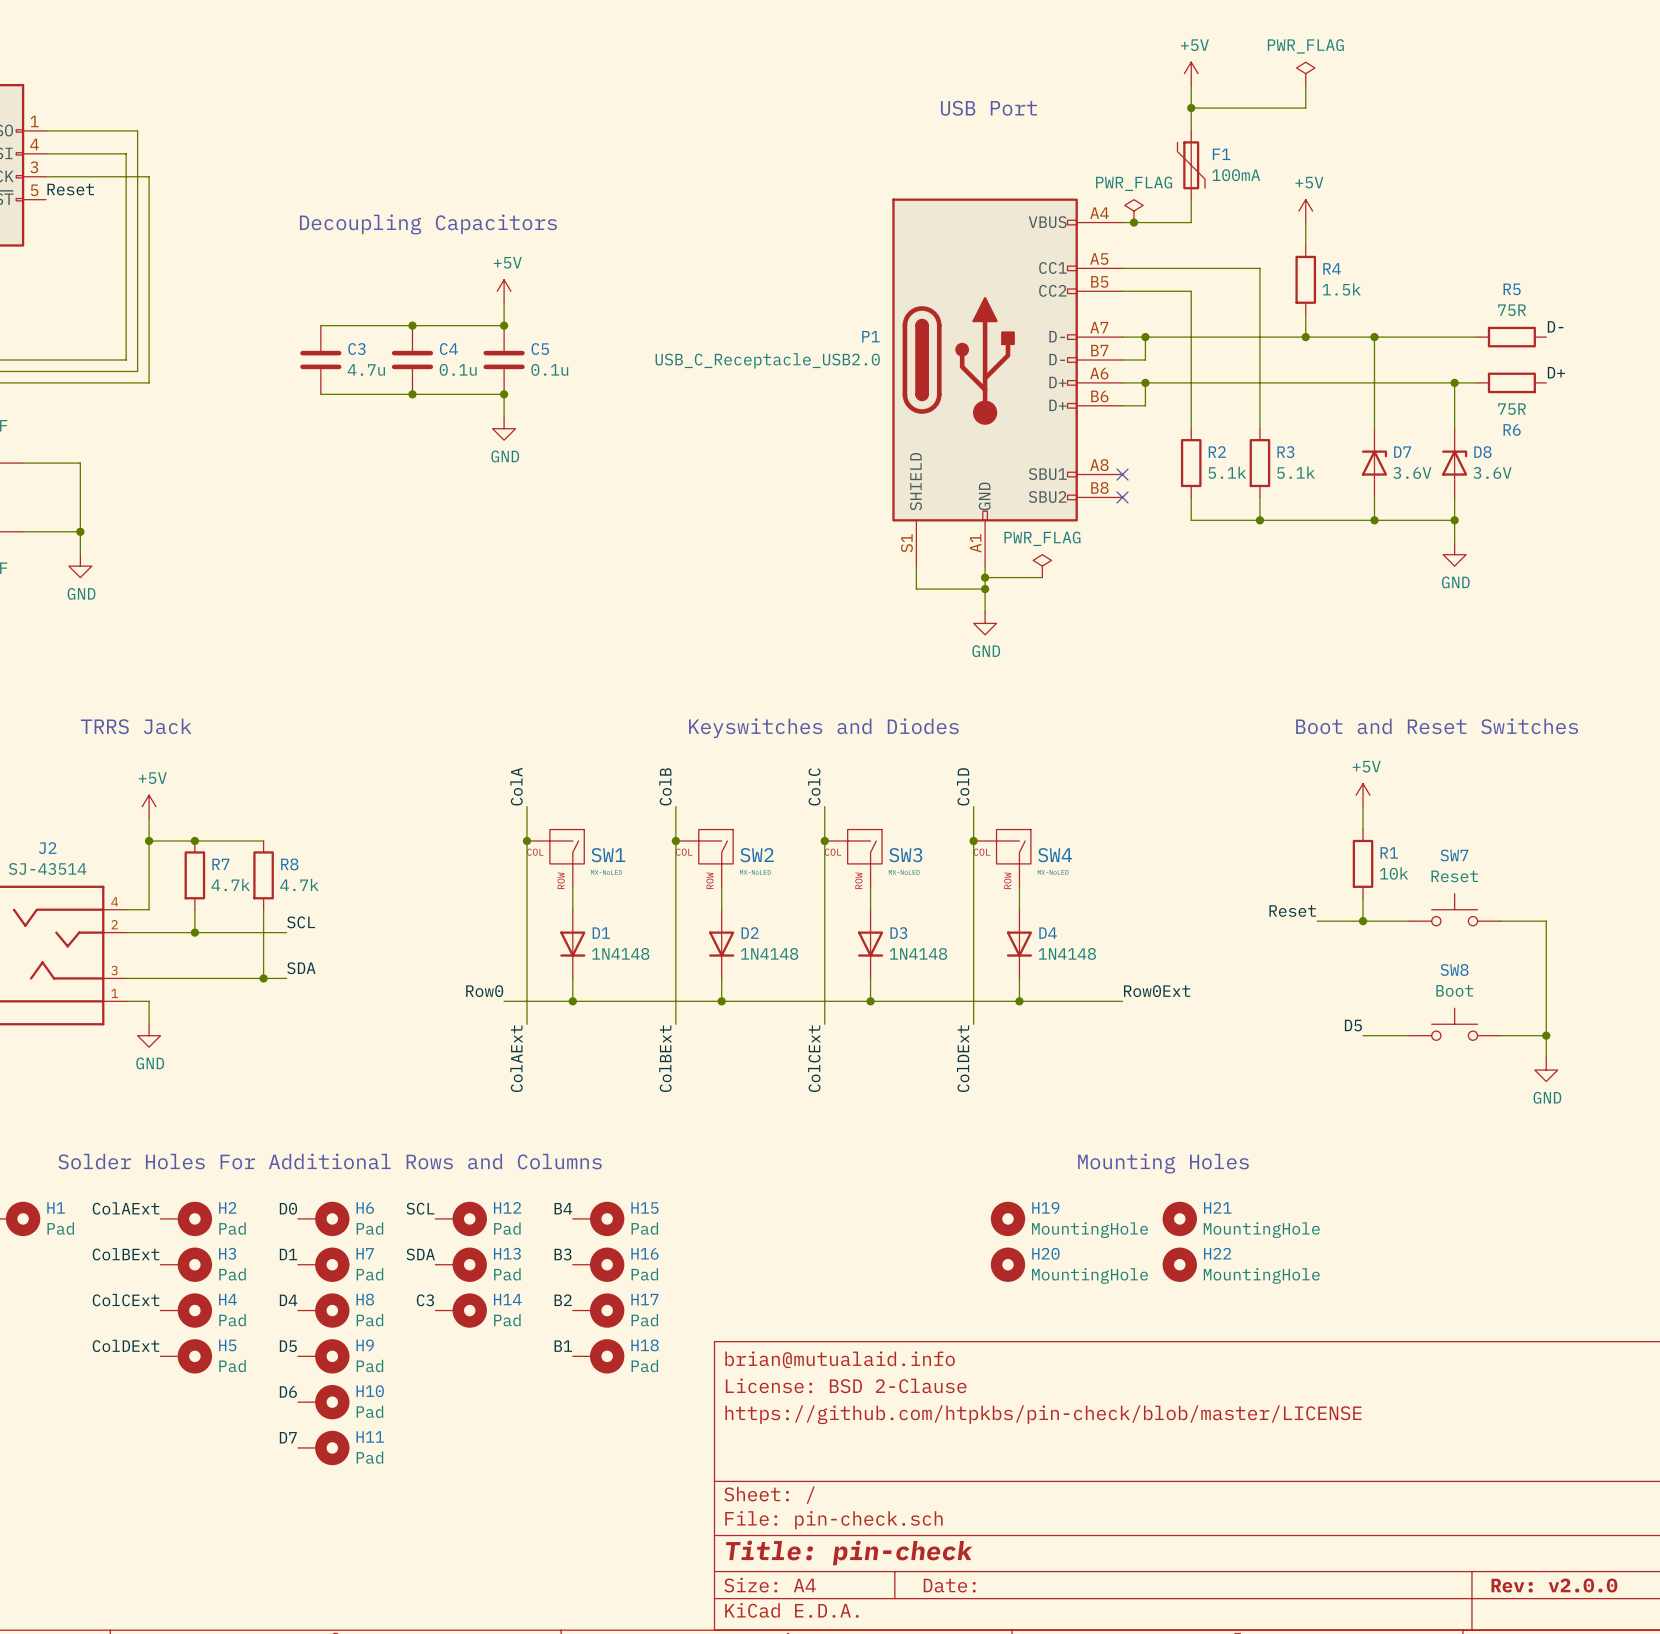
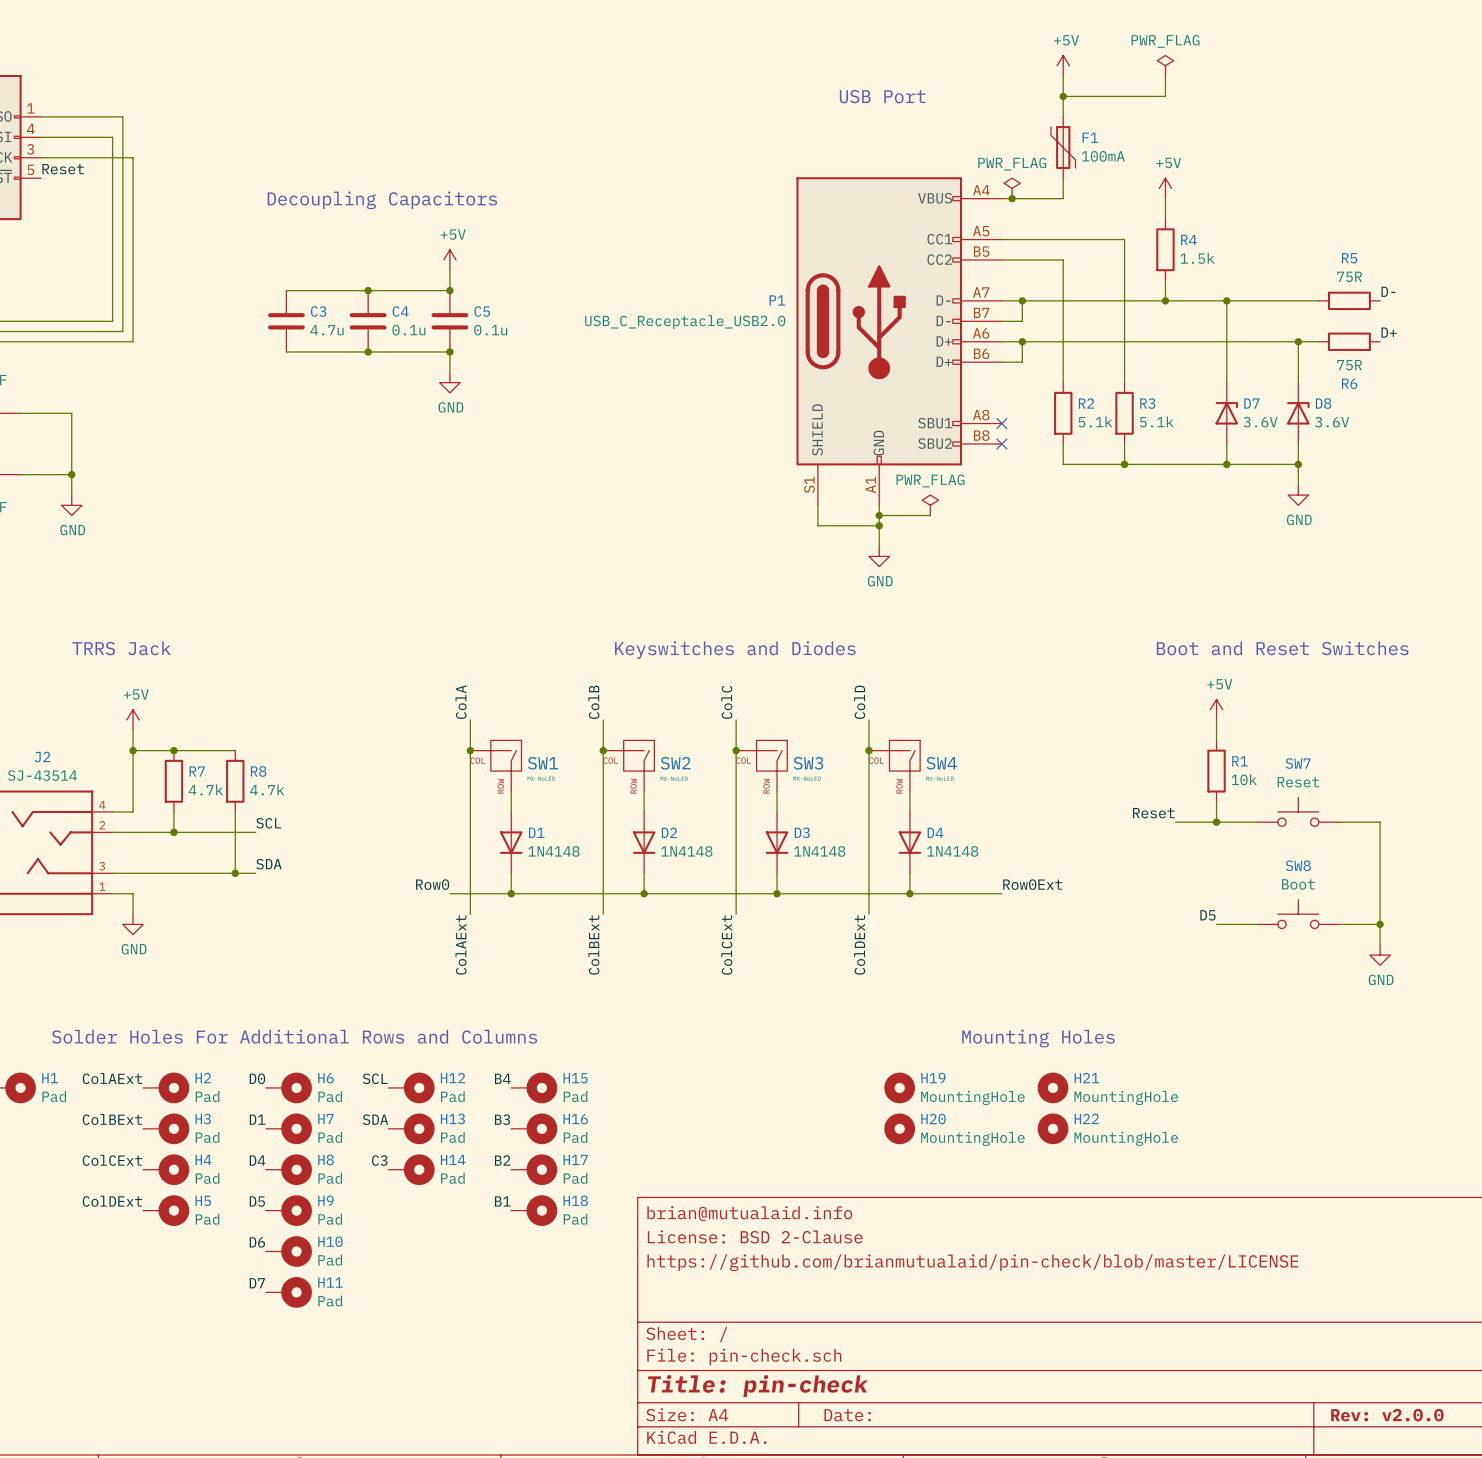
title block: https://github.com/htpkbs/pin-check/blob/master/LICENSE (1043, 1414) -> https://github.com/brianmutualaid/pin-check/blob/master/LICENSE (972, 1262)

